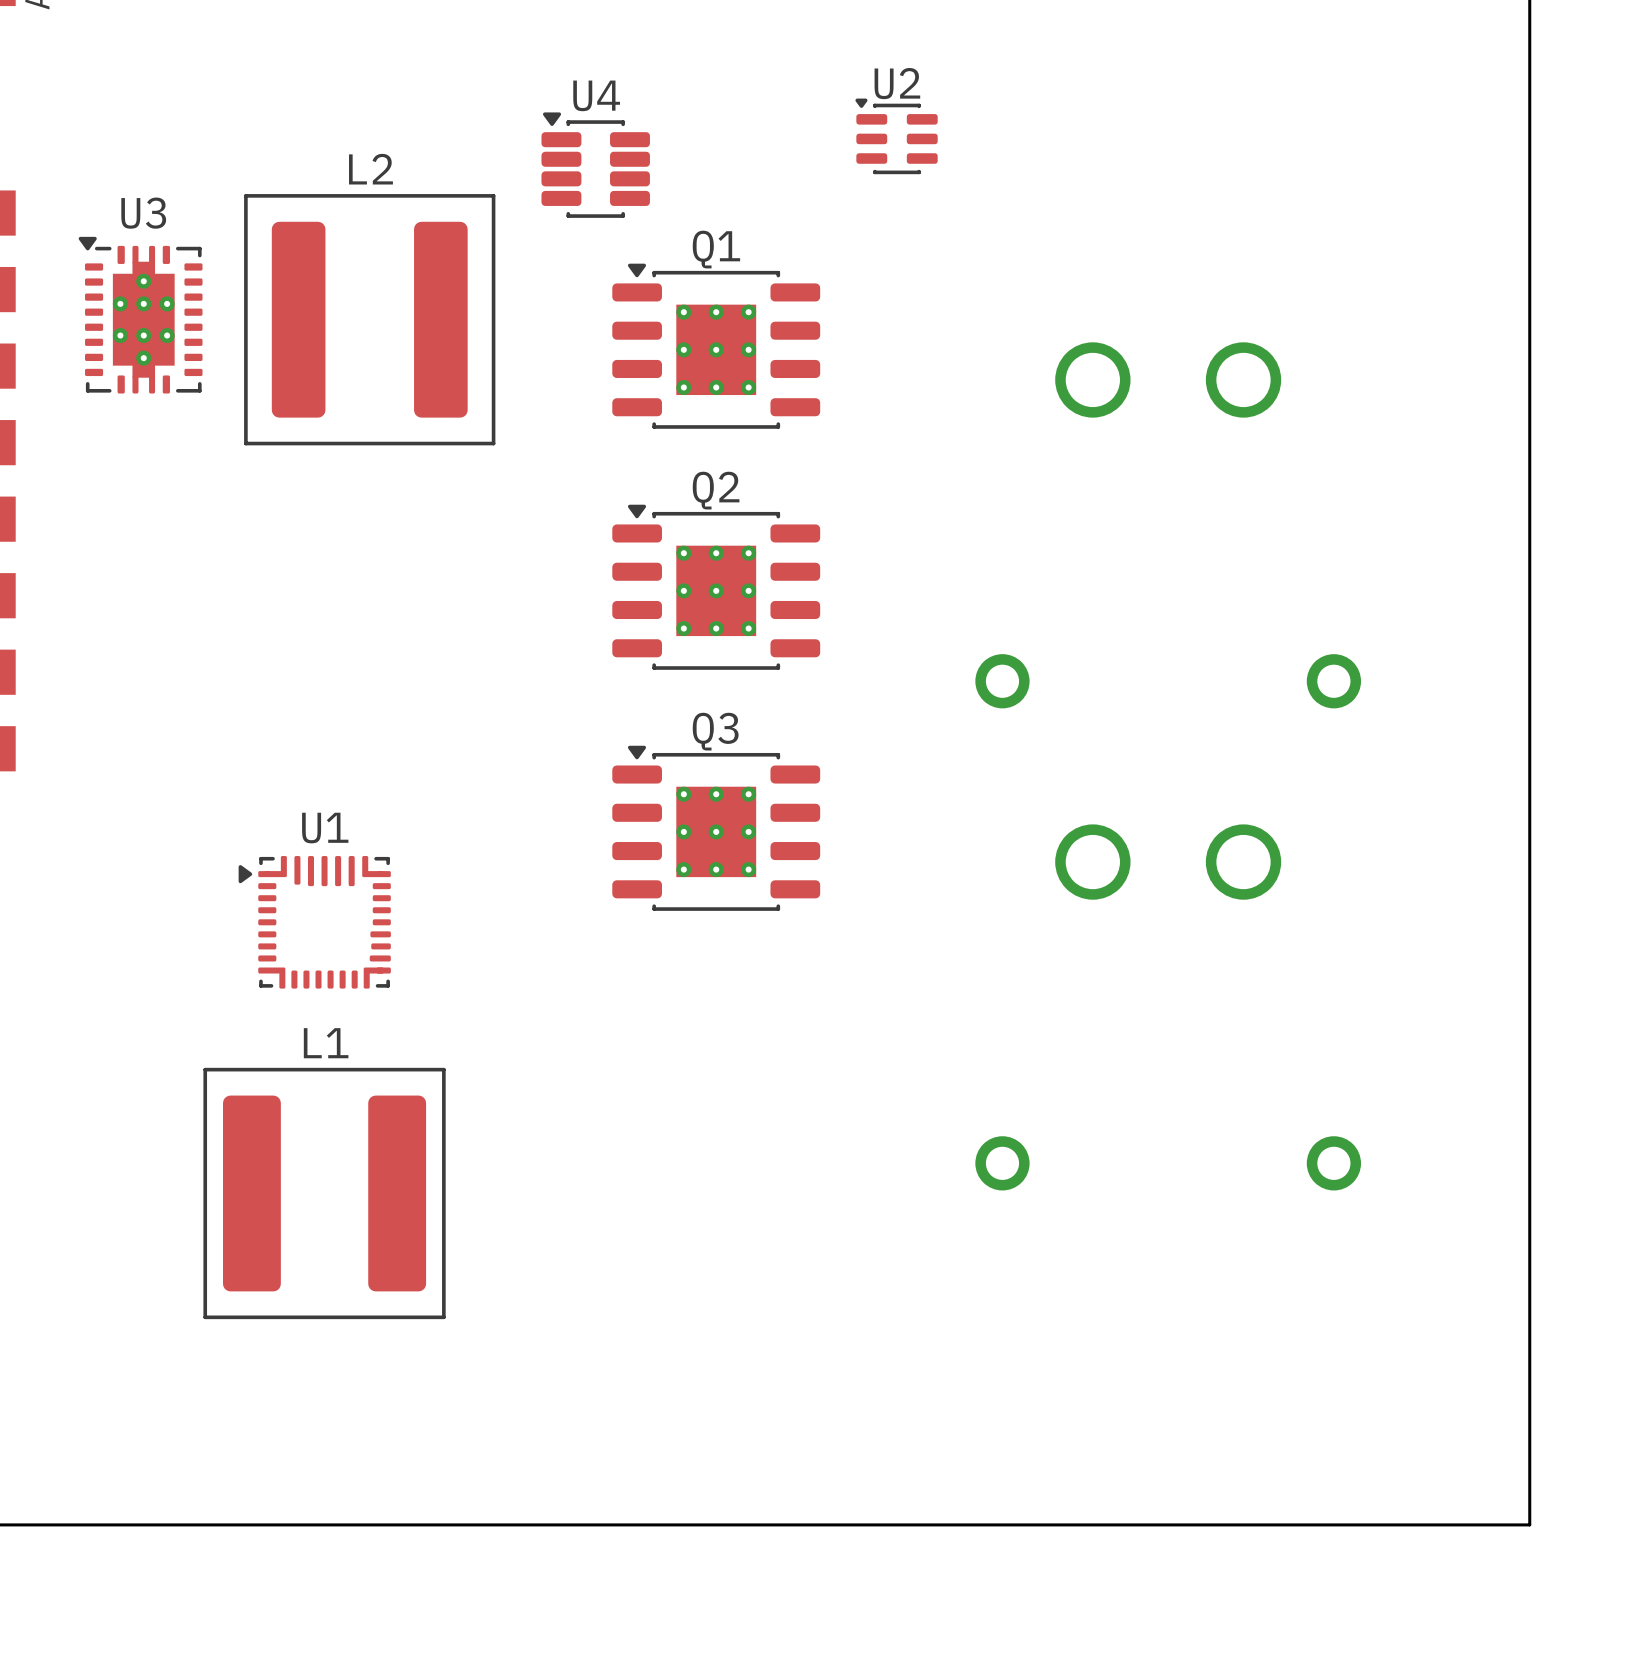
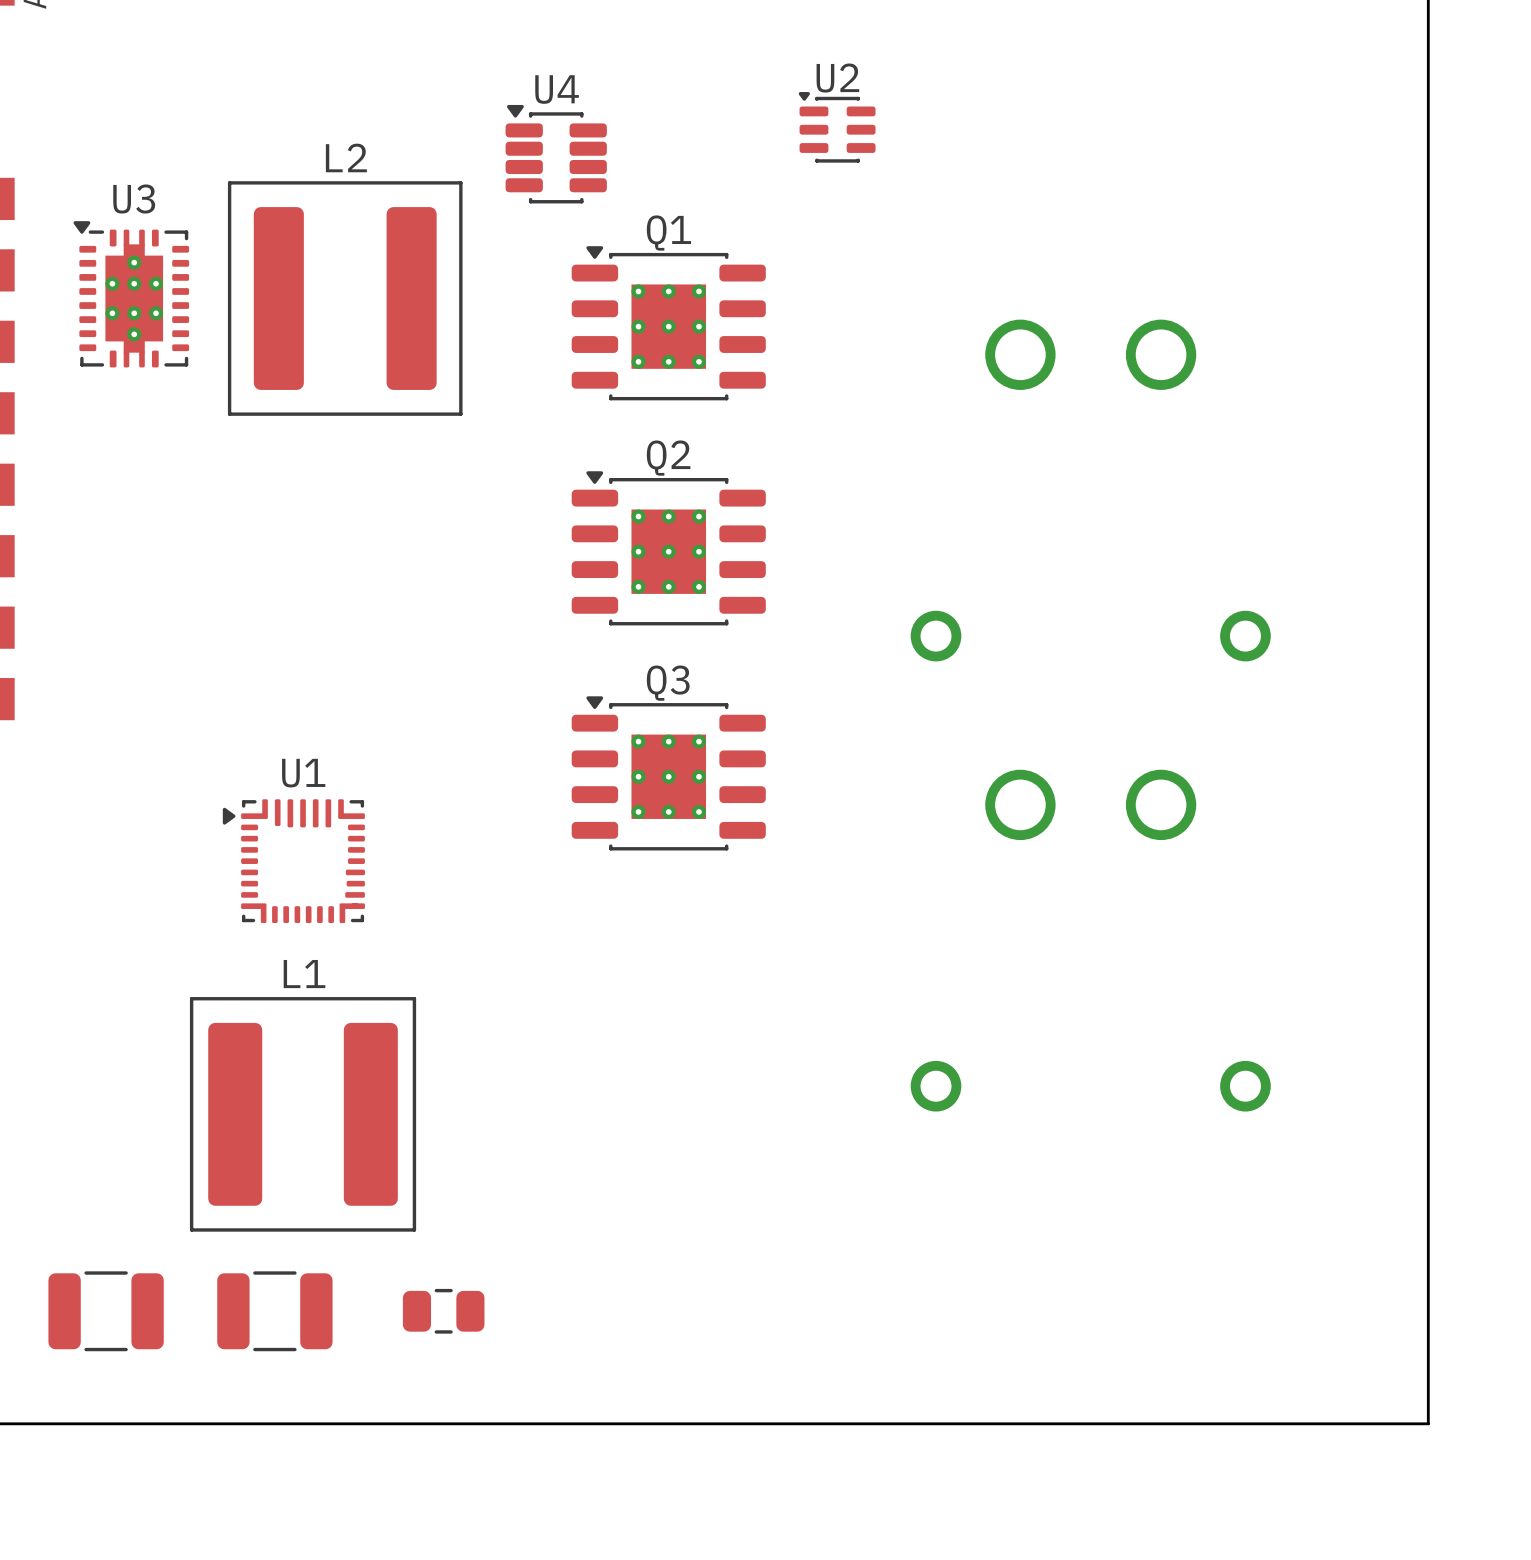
part: none -> (106, 1311)
part: none -> (274, 1311)
part: none -> (443, 1311)

